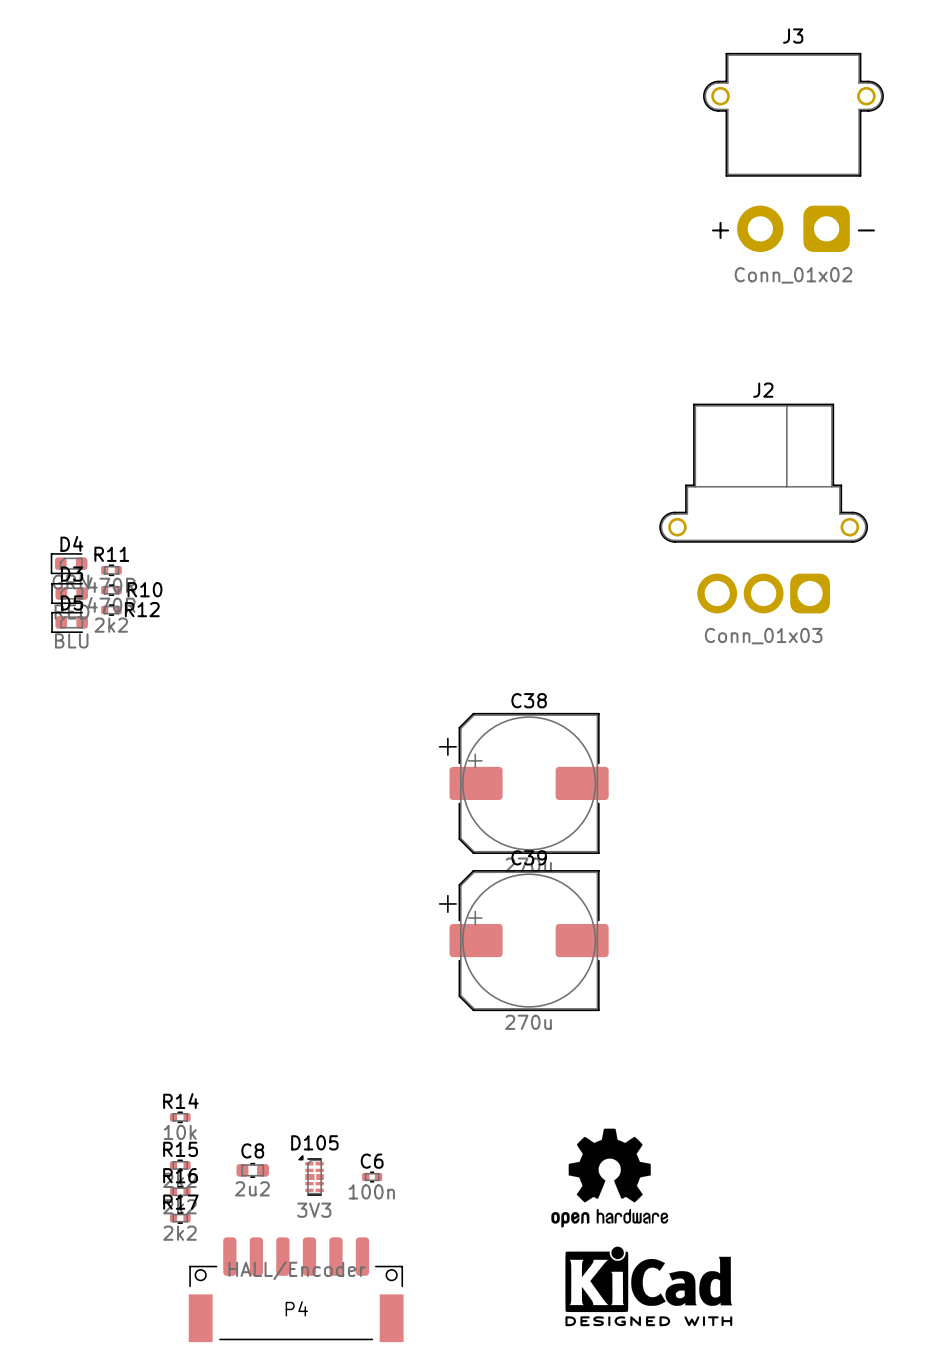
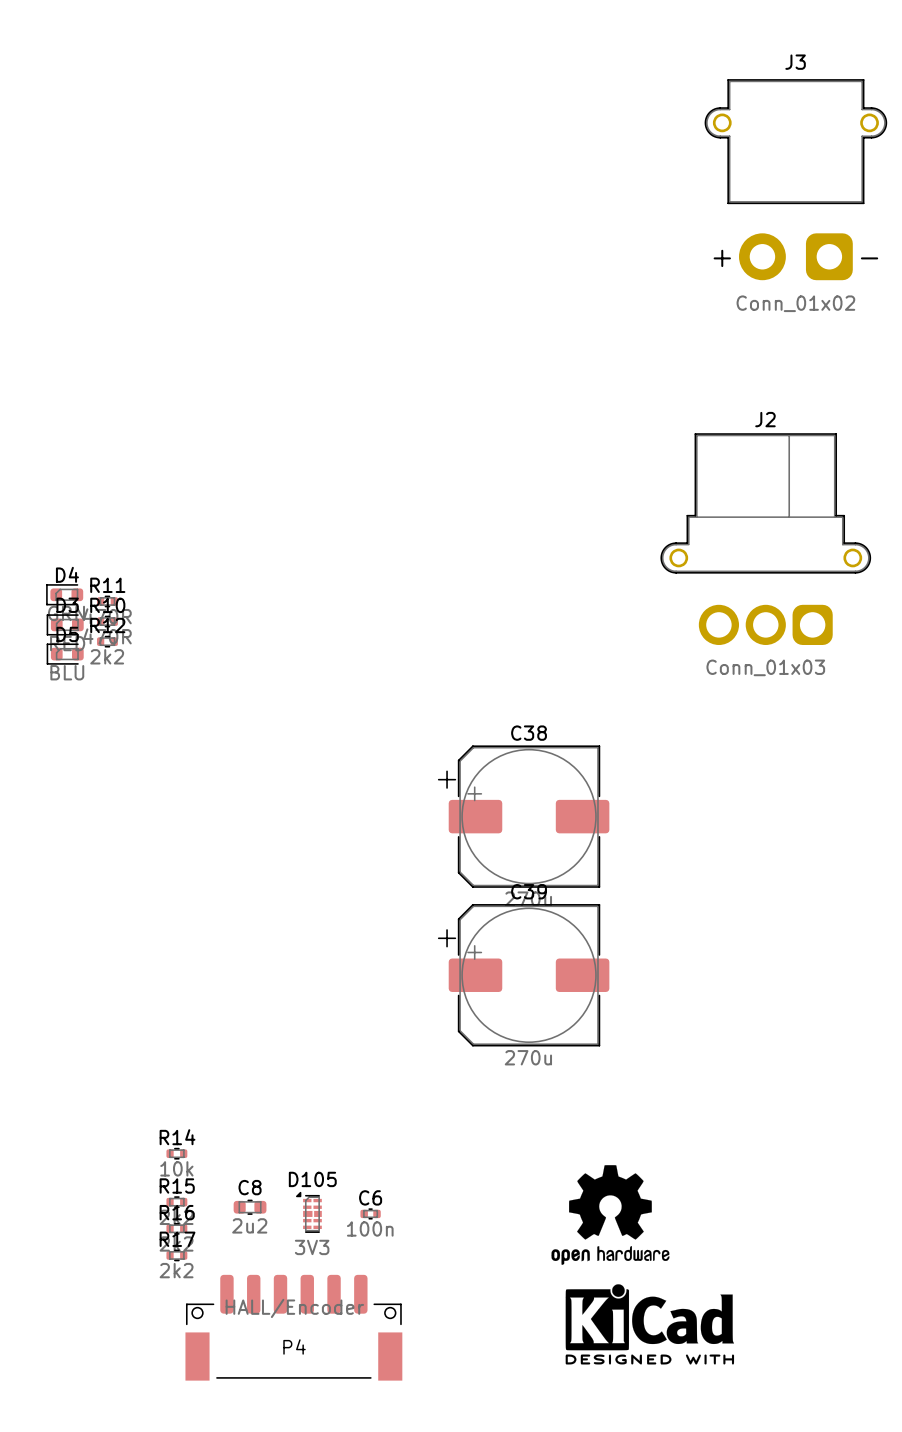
R10 name position: R10 (144, 589) -> R10 (107, 605)
R12 name position: R12 (142, 609) -> R12 (107, 625)

